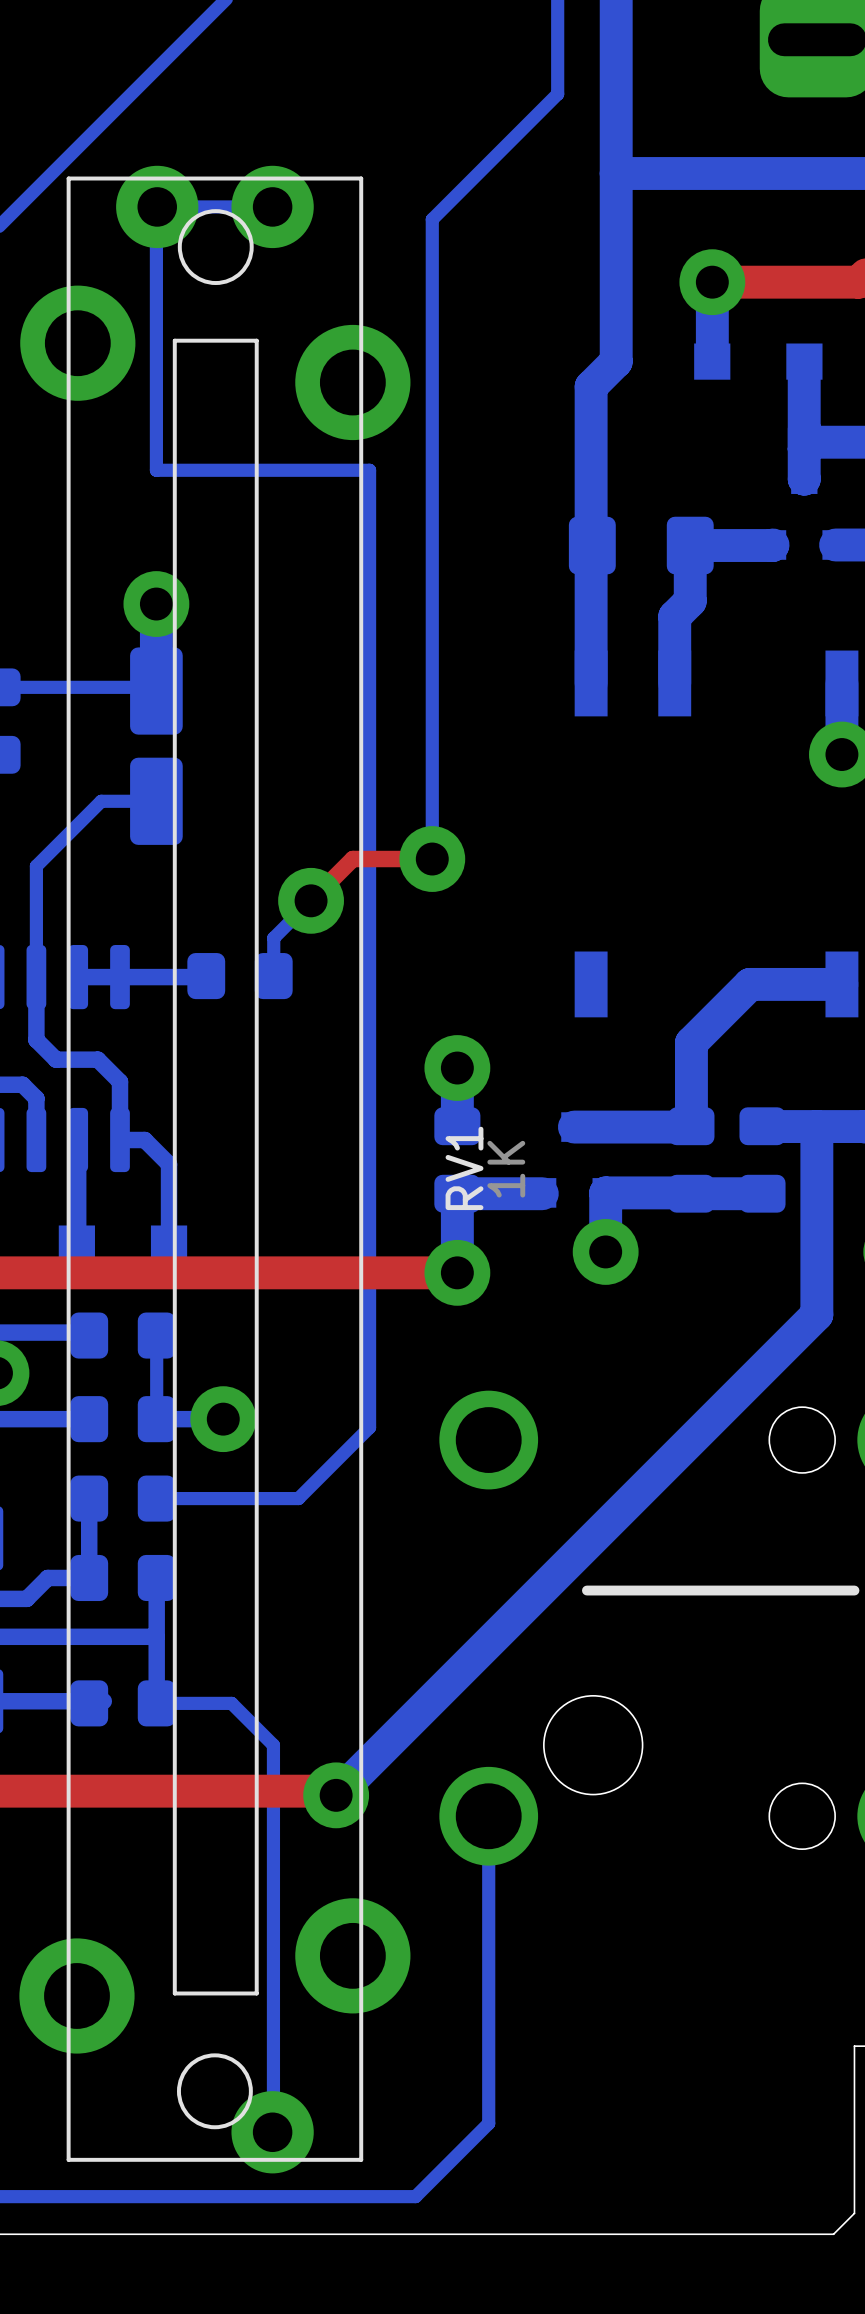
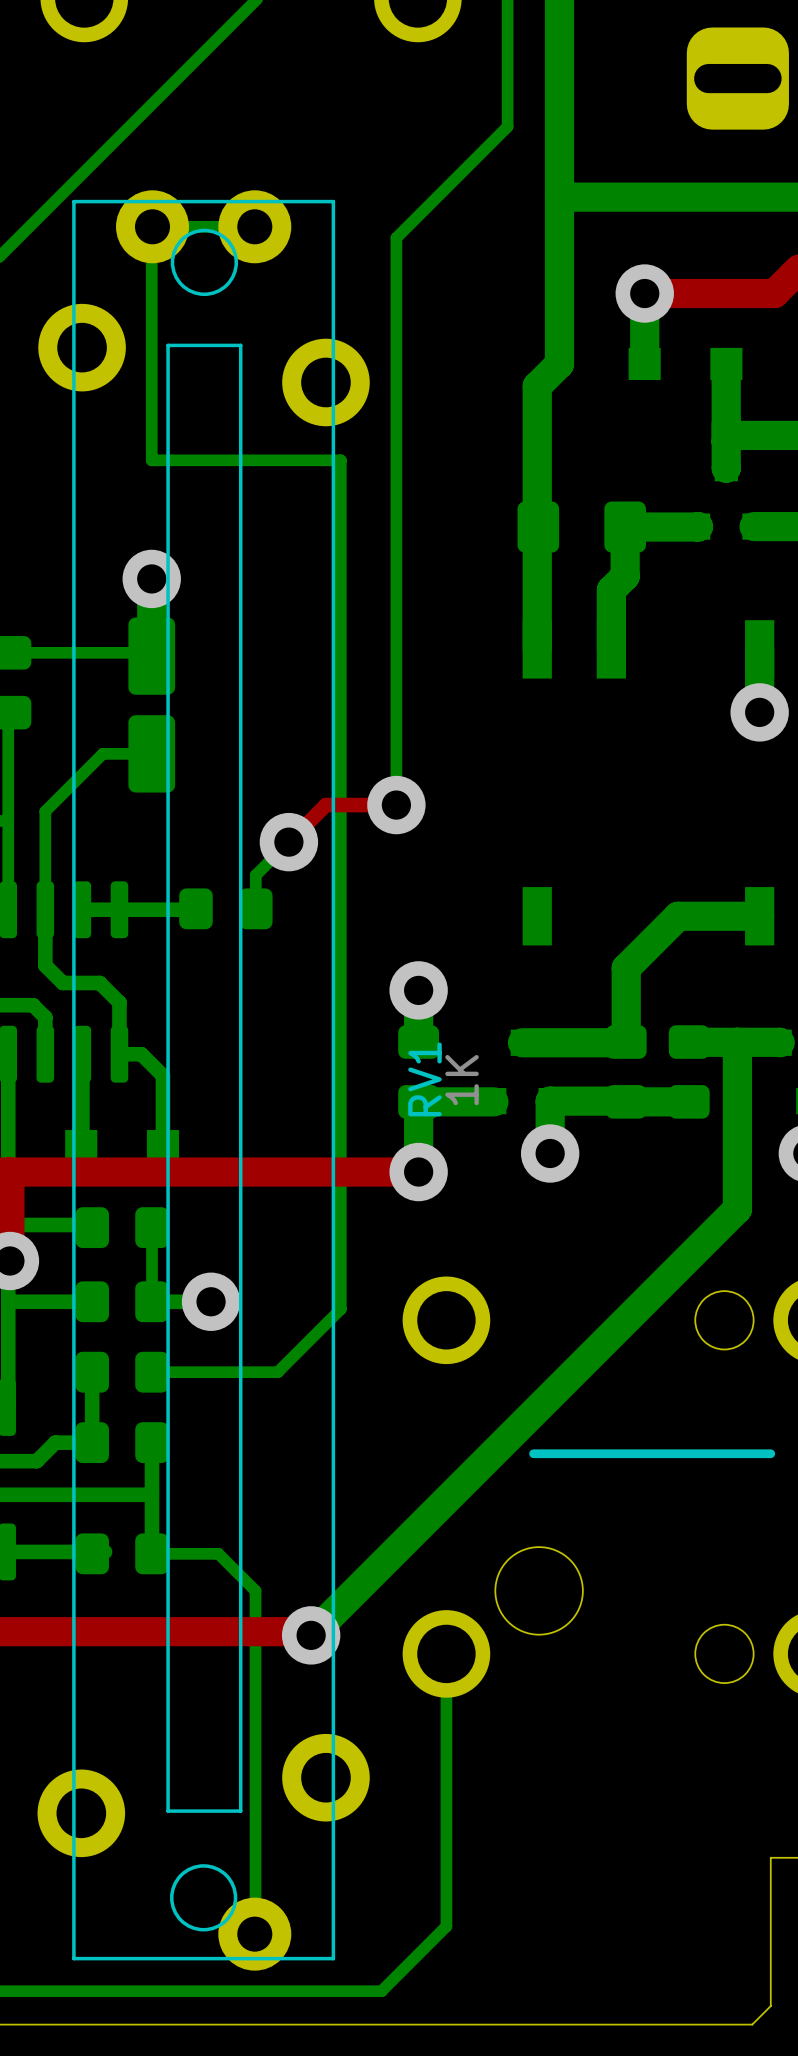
RV1 footprint: [19, 165, 411, 2174] -> [37, 190, 370, 1971]

